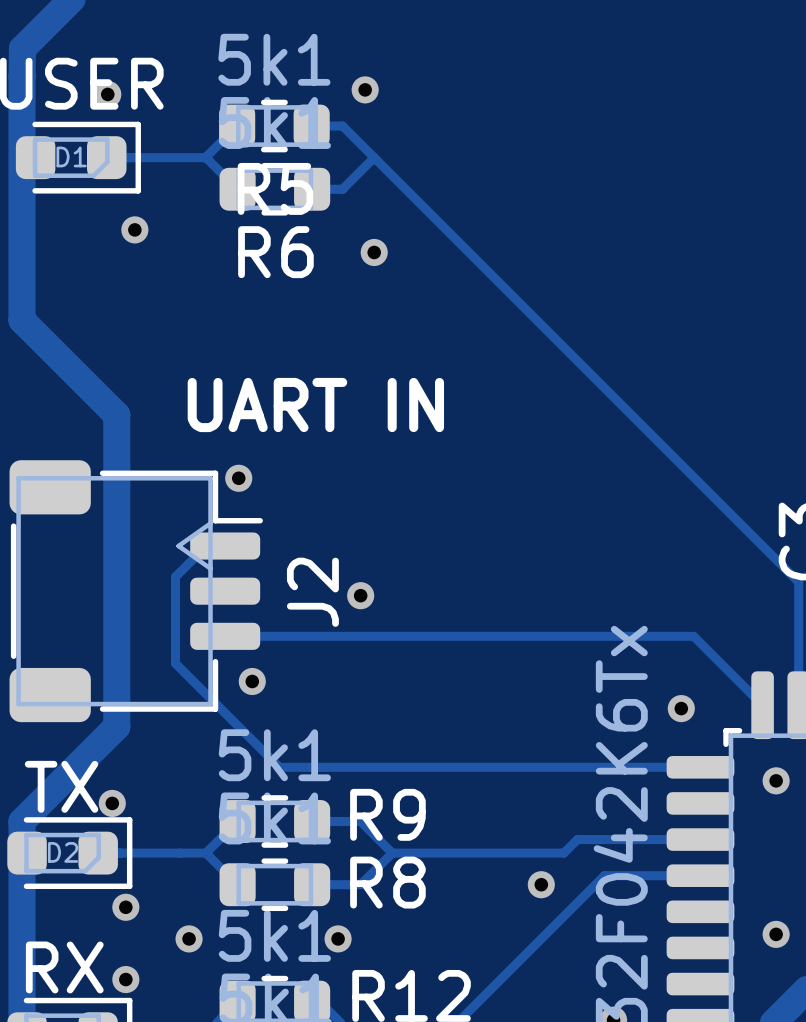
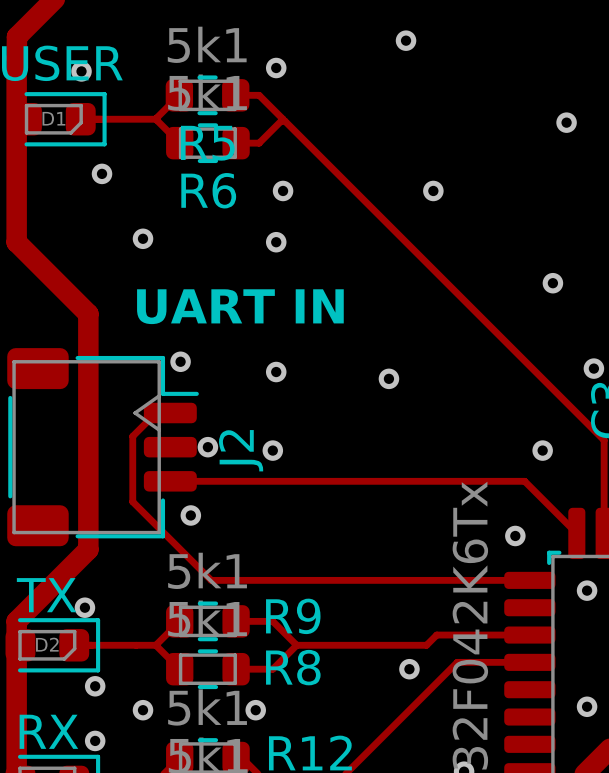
via: none -> (406, 40)
via: none -> (566, 122)
via: none -> (433, 190)
via: none -> (143, 238)
via: none -> (276, 242)
via: none -> (552, 283)
via: none -> (593, 368)
via: none -> (276, 372)
via: none -> (388, 378)
via: none -> (207, 447)
via: none -> (542, 450)

